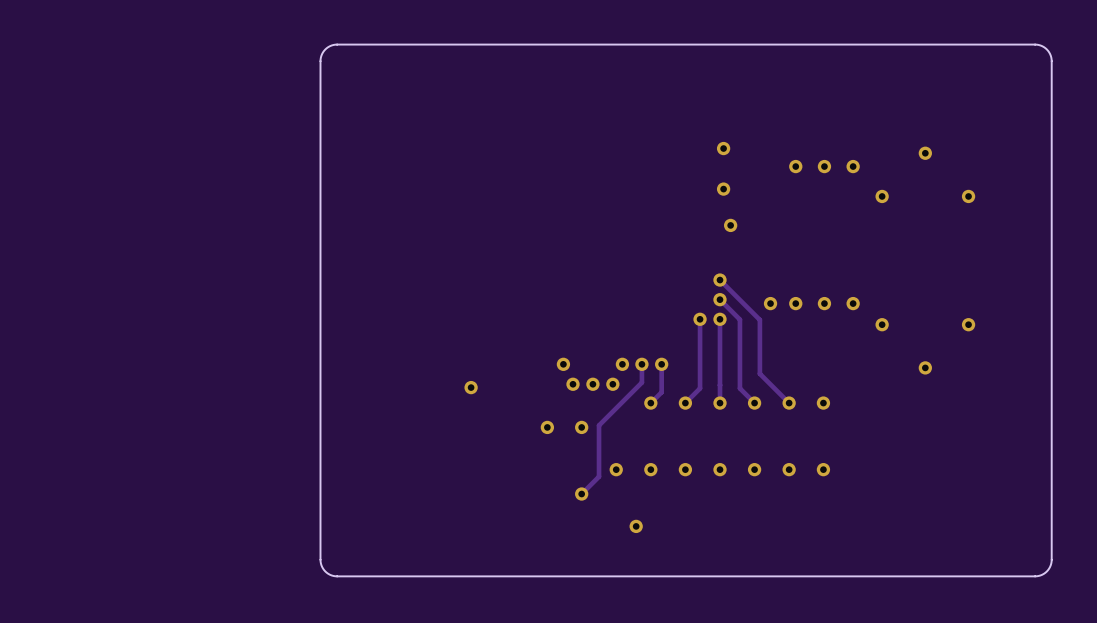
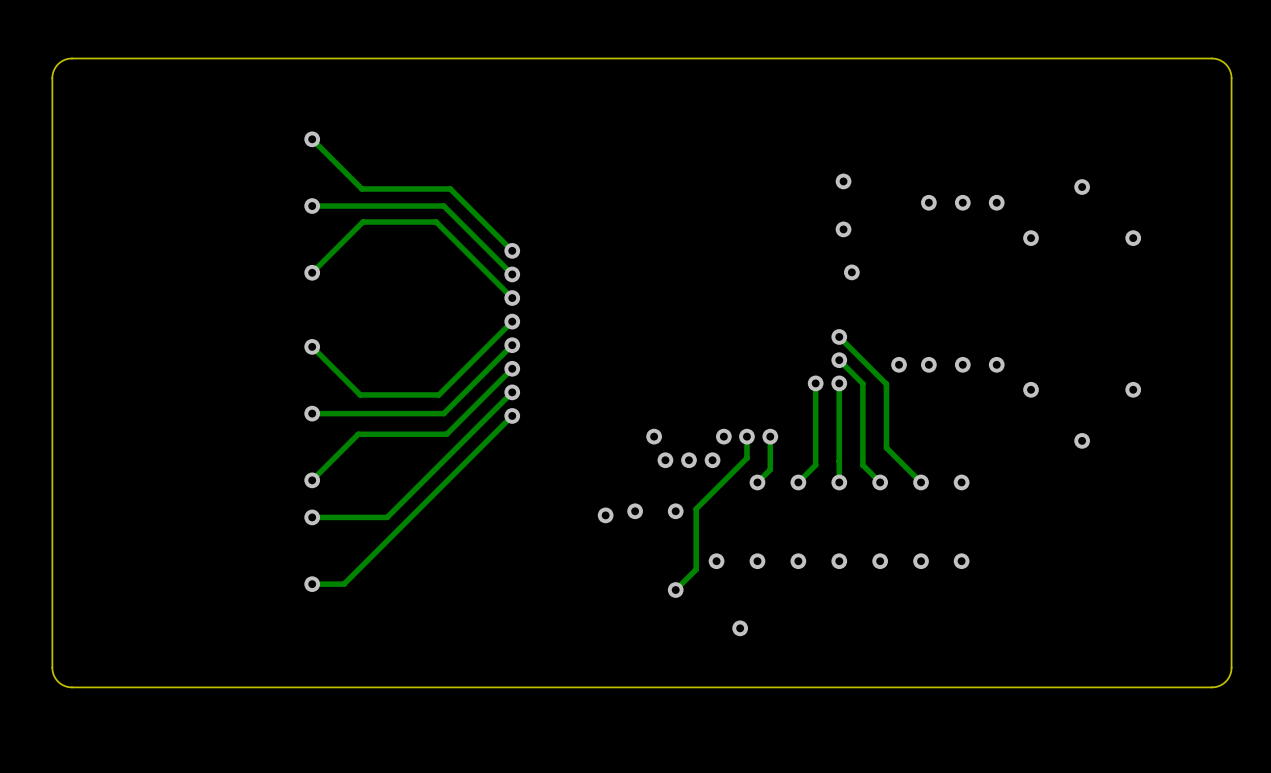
board edge: (337, 44) (325, 49) (320, 61) (320, 559) (325, 571) (337, 576) -> (386, 58) (69, 58) (56, 65) (52, 78) (52, 667) (54, 676) (61, 684) (72, 687) (386, 687)
track: none -> (312, 139) (361, 188) (450, 188) (512, 250)
via: none -> (312, 139)
track: none -> (312, 206) (443, 206) (512, 274)
via: none -> (312, 206)
via: none -> (512, 250)
track: none -> (312, 272) (362, 222) (436, 222) (512, 298)
via: none -> (312, 272)
via: none -> (512, 274)
via: none -> (512, 298)
track: none -> (512, 321) (438, 394) (360, 394) (312, 346)
via: none -> (512, 321)
track: none -> (512, 345) (443, 413) (312, 413)
via: none -> (512, 345)
via: none -> (312, 346)
track: none -> (512, 368) (446, 434) (358, 434) (312, 480)
via: none -> (512, 368)
track: none -> (512, 392) (387, 517) (312, 517)
via: none -> (512, 392)
via: none -> (312, 413)
track: none -> (512, 415) (344, 584) (312, 584)
via: none -> (512, 415)
via: (471, 387) -> none
via: none -> (312, 480)
via: none -> (605, 515)
via: none -> (312, 517)
via: none -> (312, 584)

